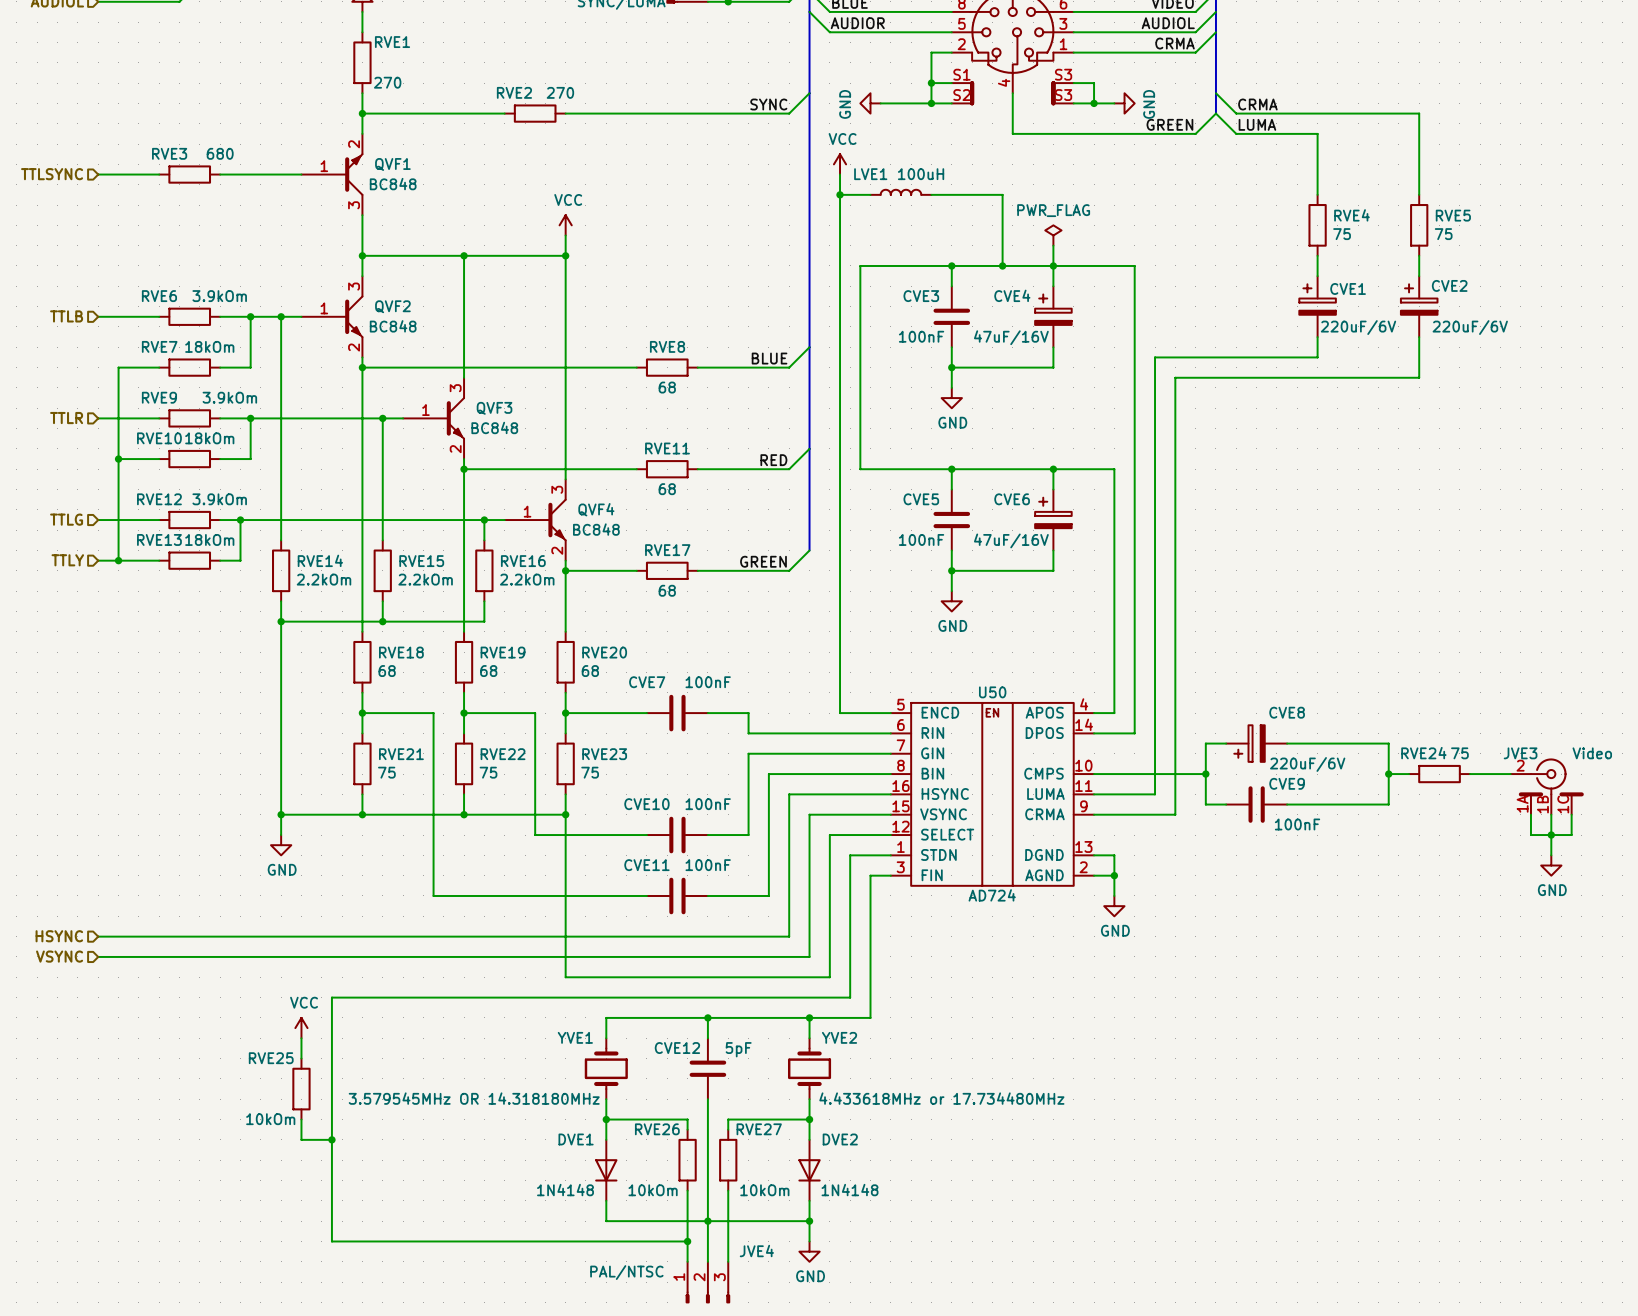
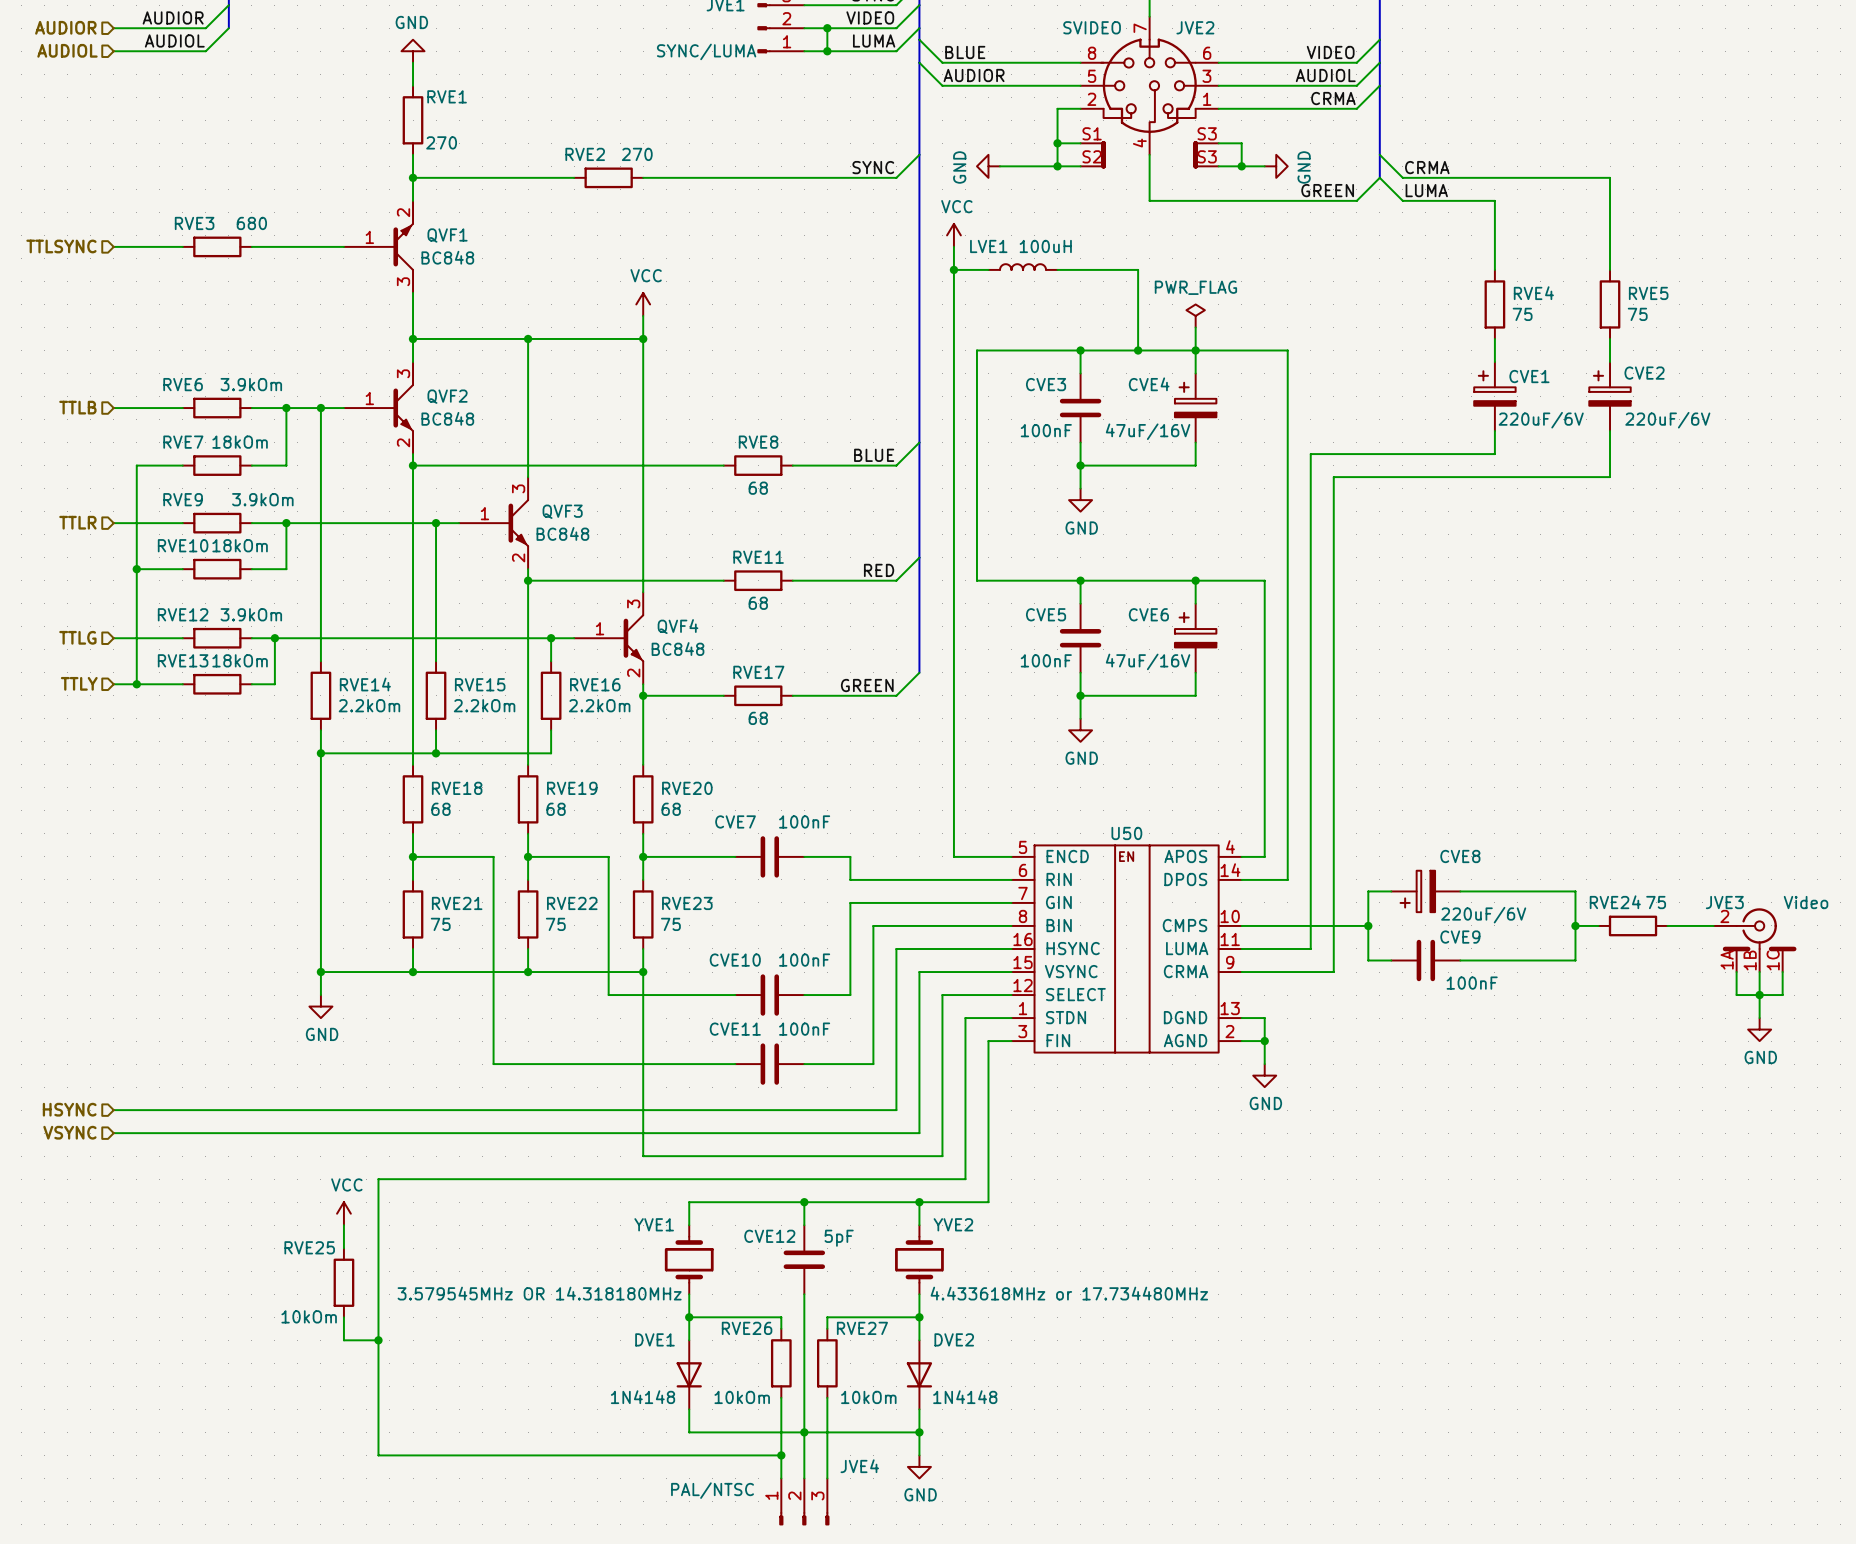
U50 value: AD724 (992, 895) -> none

